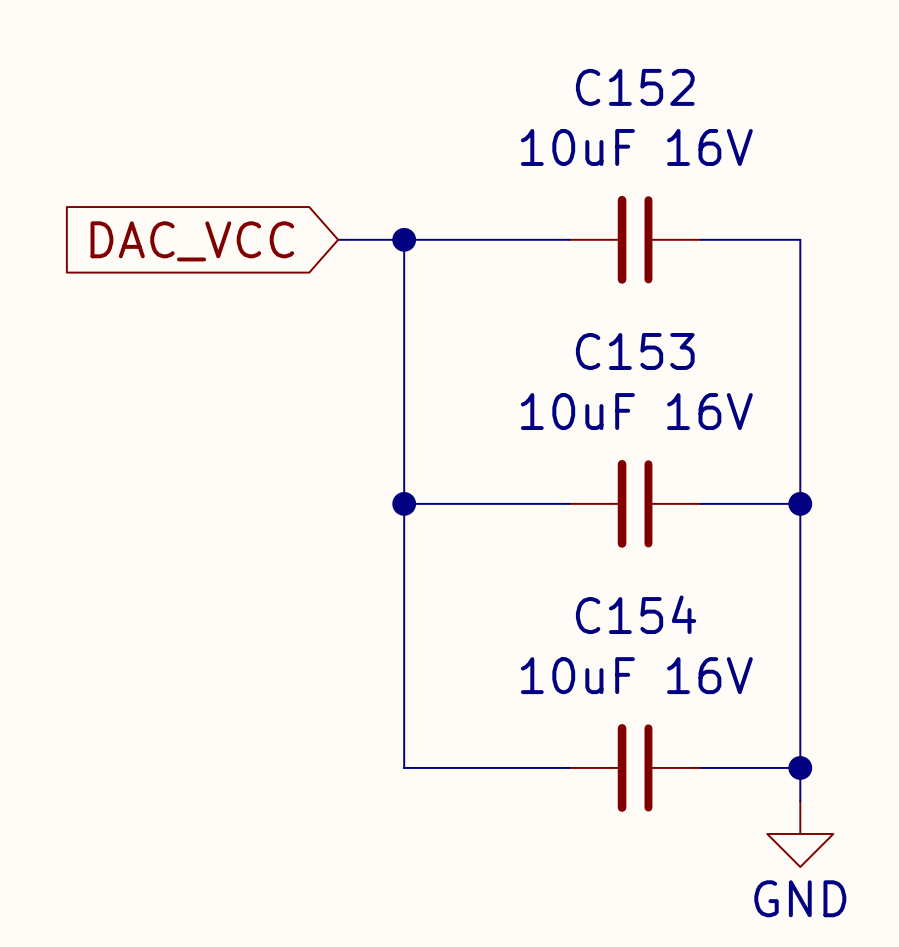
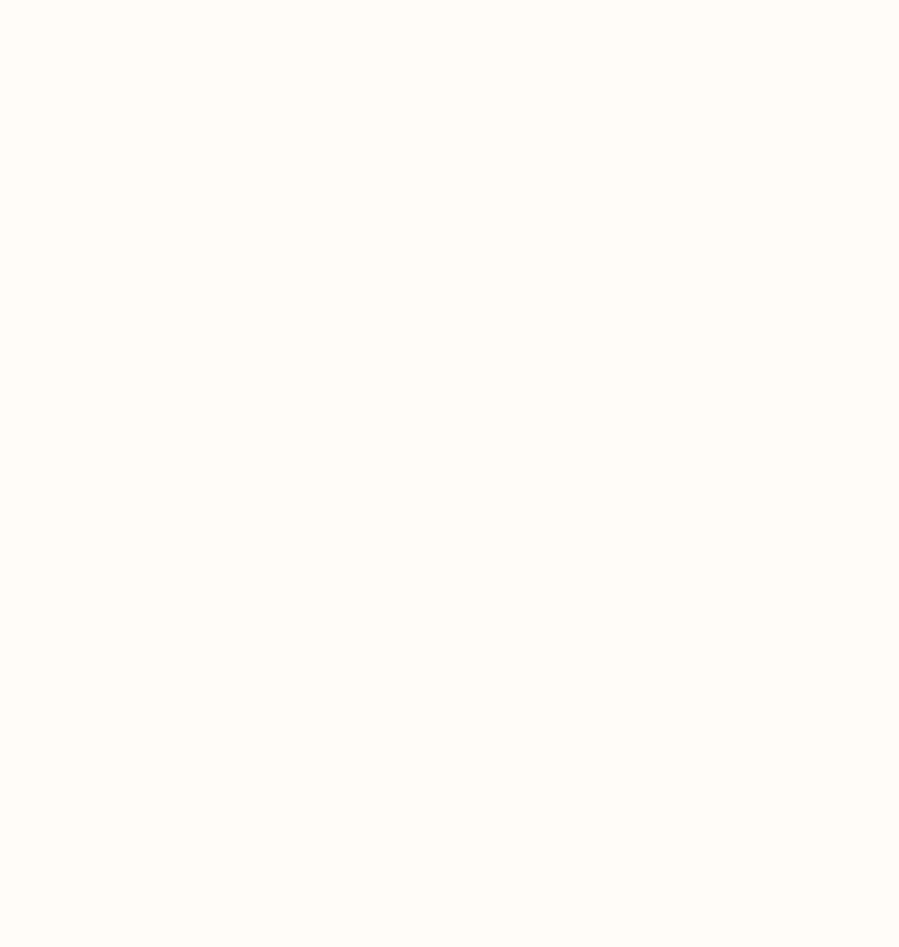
wire: (338, 239) (569, 239) -> none
wire: (404, 239) (404, 767) (569, 767) -> none
junction: (404, 239) -> none
C152: 10uF 16V (635, 239) -> none
wire: (701, 239) (800, 239) (800, 800) -> none
global label: DAC_VCC (192, 241) -> none
wire: (404, 503) (569, 503) -> none
junction: (404, 503) -> none
C153: 10uF 16V (635, 503) -> none
wire: (701, 503) (800, 503) -> none
junction: (800, 503) -> none
C154: 10uF 16V (635, 767) -> none
wire: (701, 767) (800, 767) -> none
junction: (800, 767) -> none
power symbol: GND (800, 833) -> none

